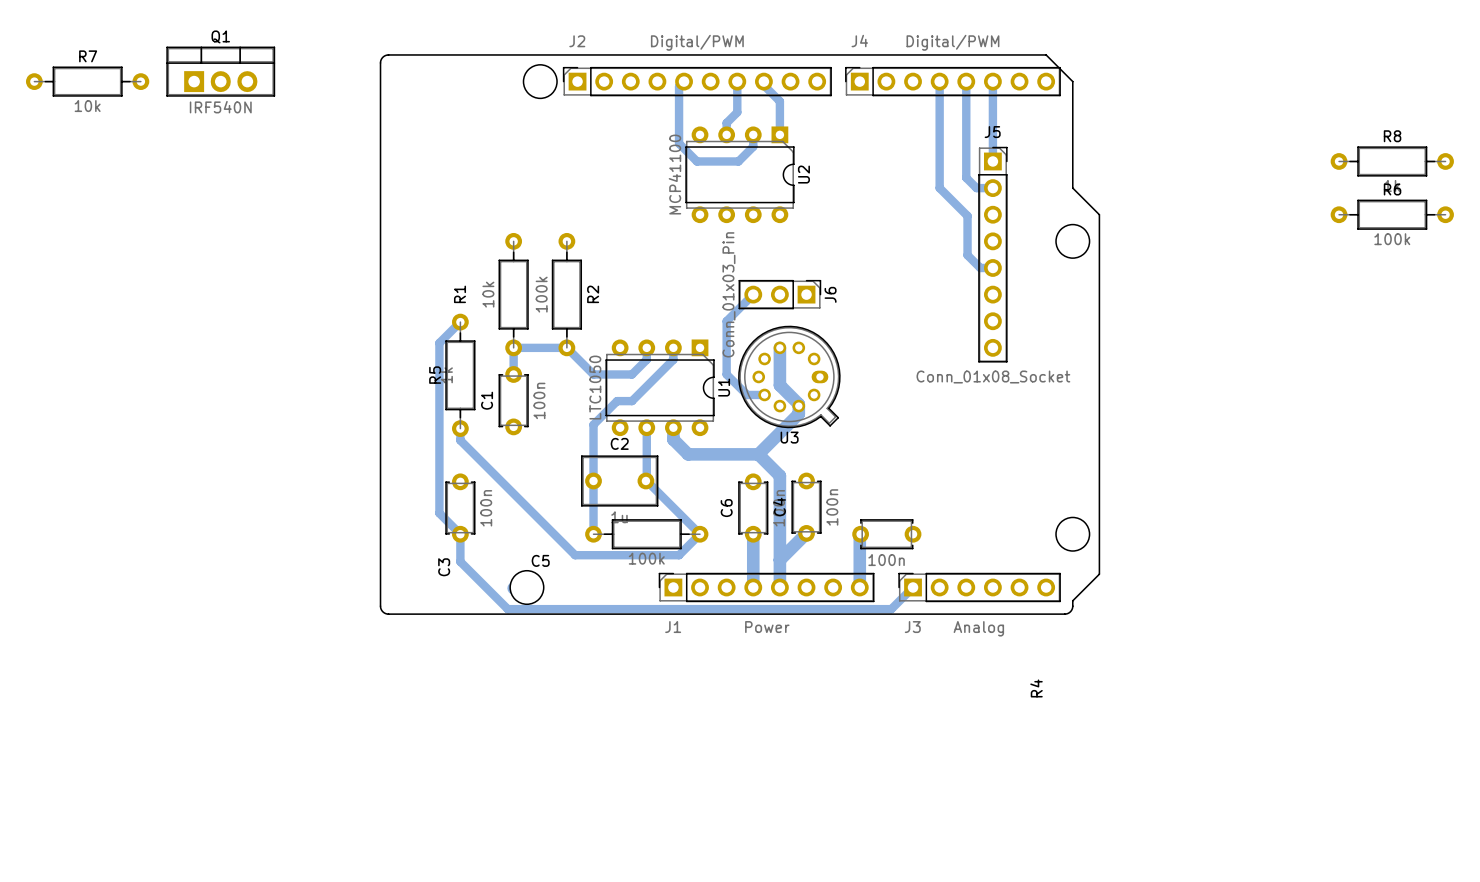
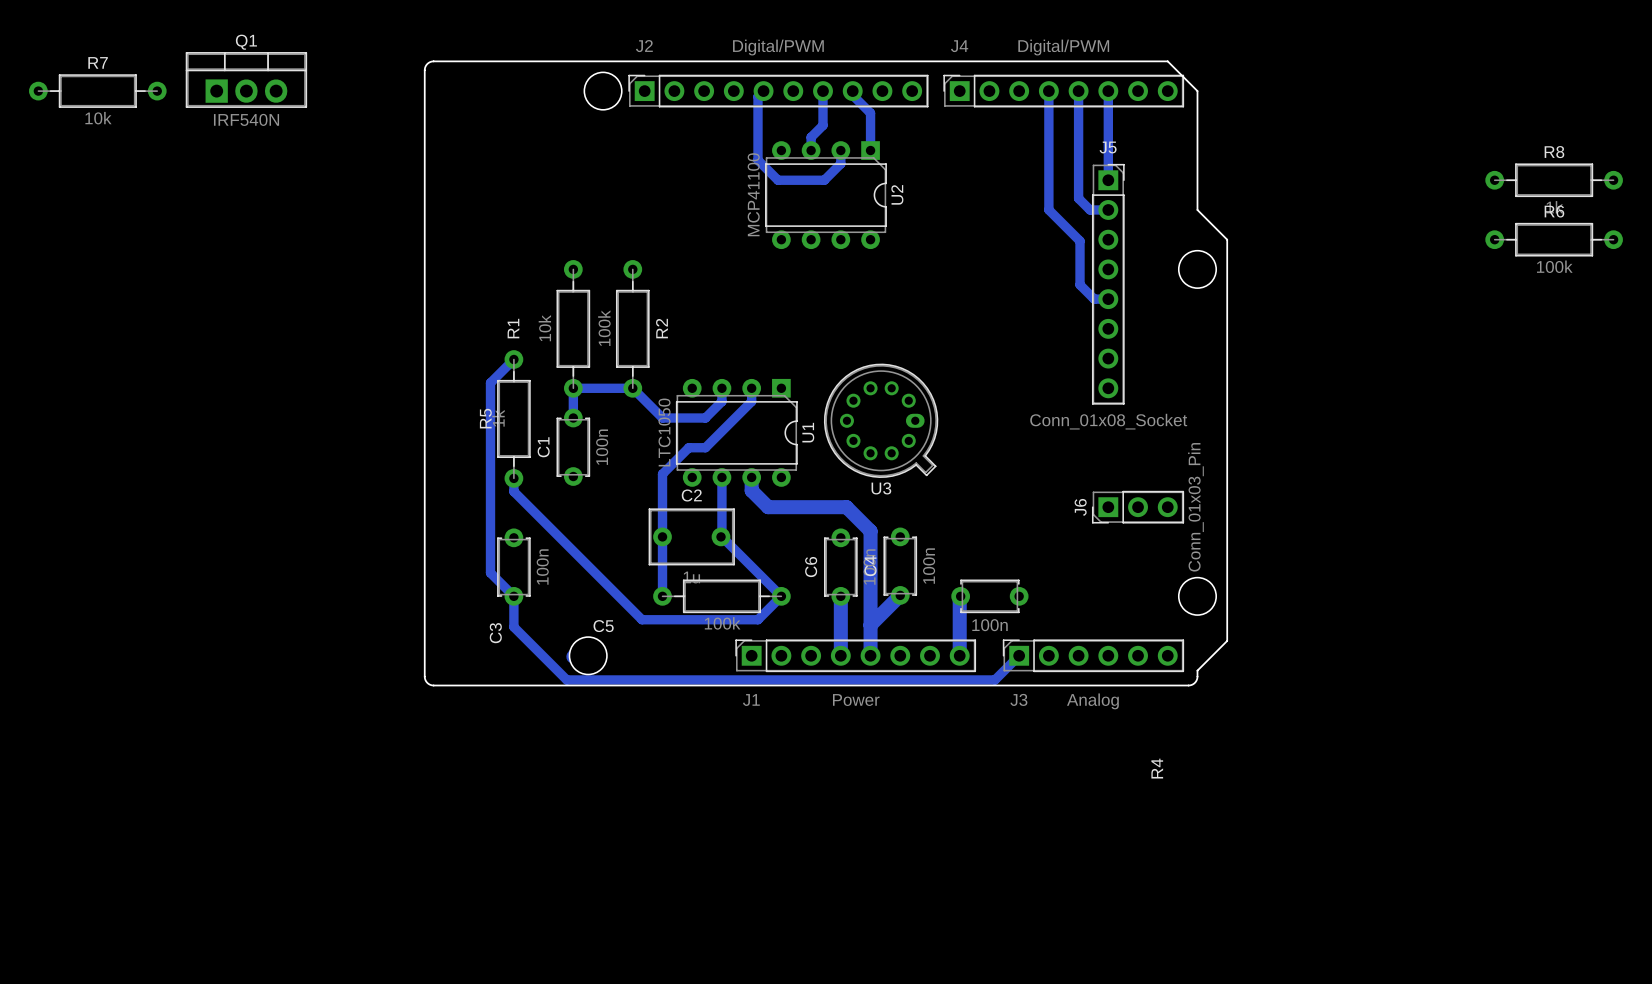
bottom track: (753, 294) (726, 321) (726, 374) (747, 394) (764, 394) -> none
J6 rotation: 0° (779, 294) -> 180° (1138, 507)
J6 position: (779, 294) -> (1138, 507)
bottom track: (779, 347) (779, 385) (798, 404) (798, 413) (758, 454) -> none

